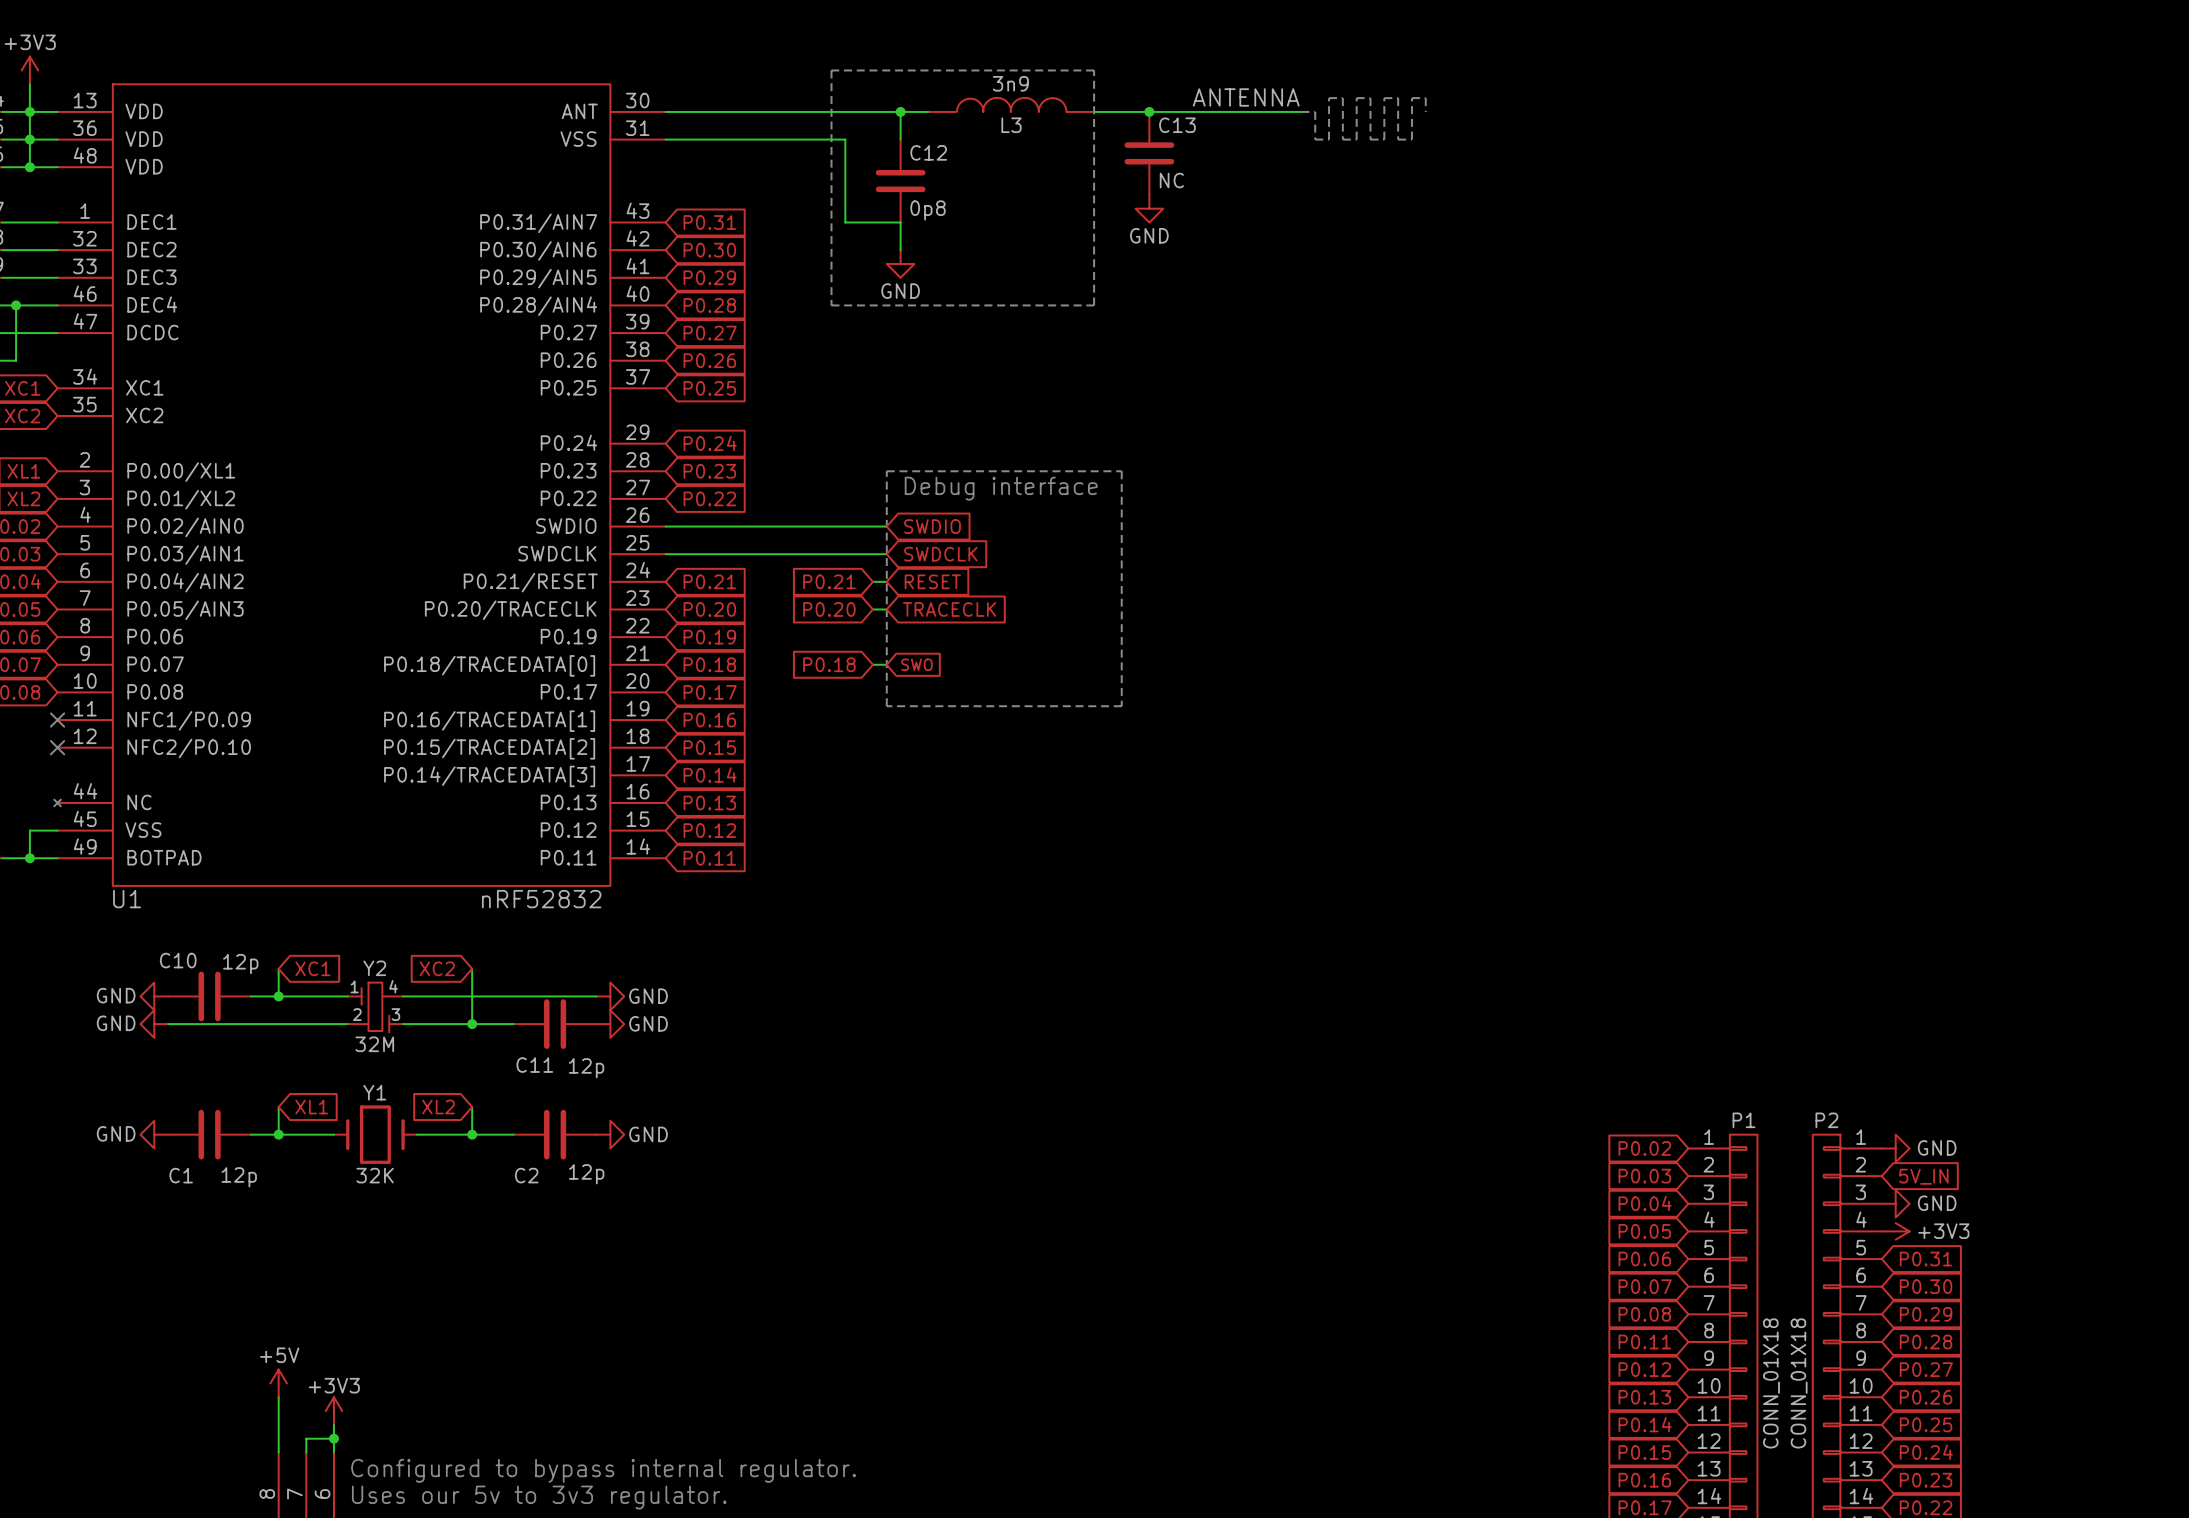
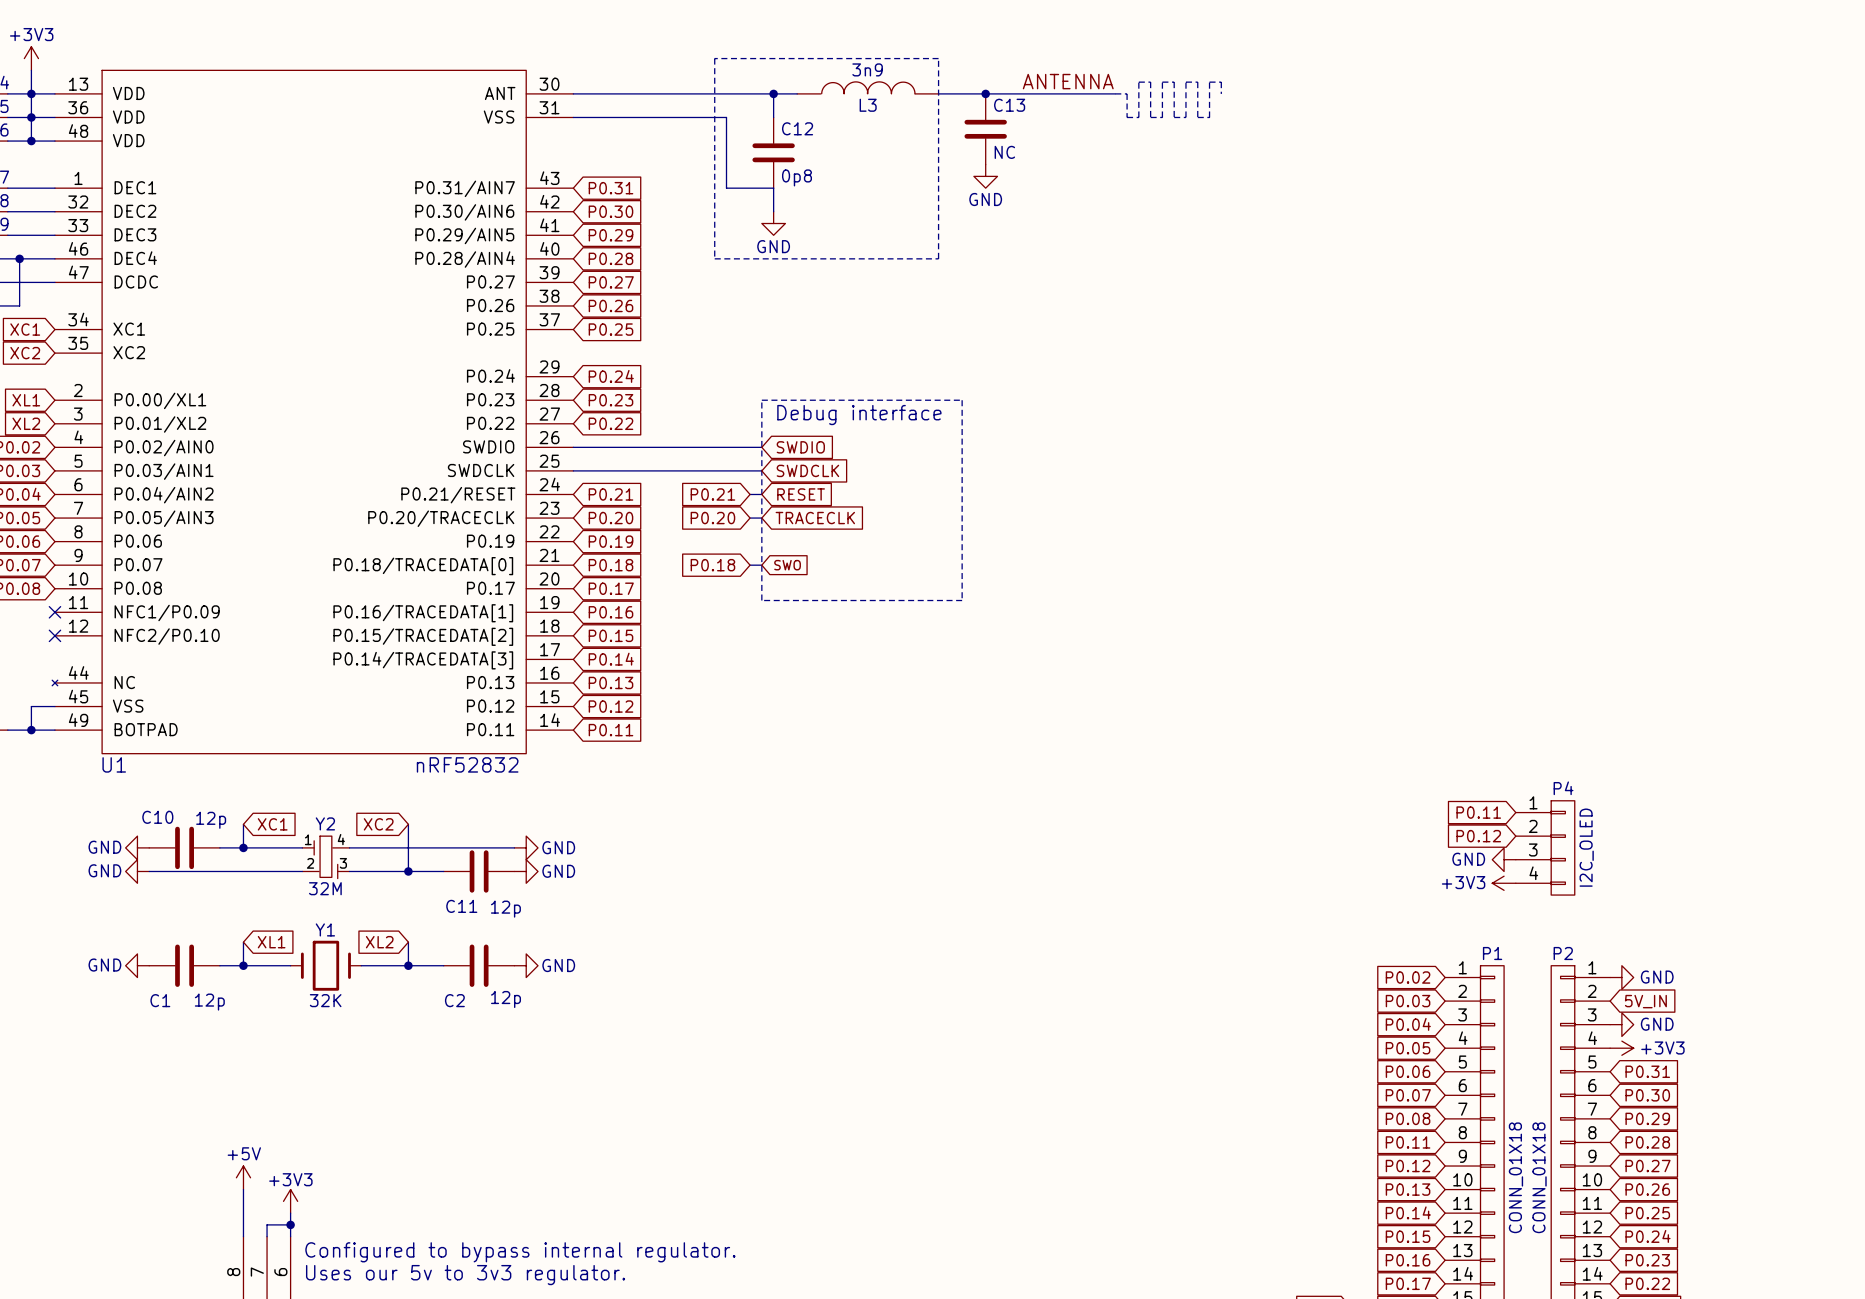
global label: none -> P0.11 (1478, 812)
global label: none -> P0.12 (1478, 836)
P4: none -> I2C_OLED (1545, 847)
power symbol: none -> GND (1504, 859)
power symbol: none -> +3V3 (1504, 883)

